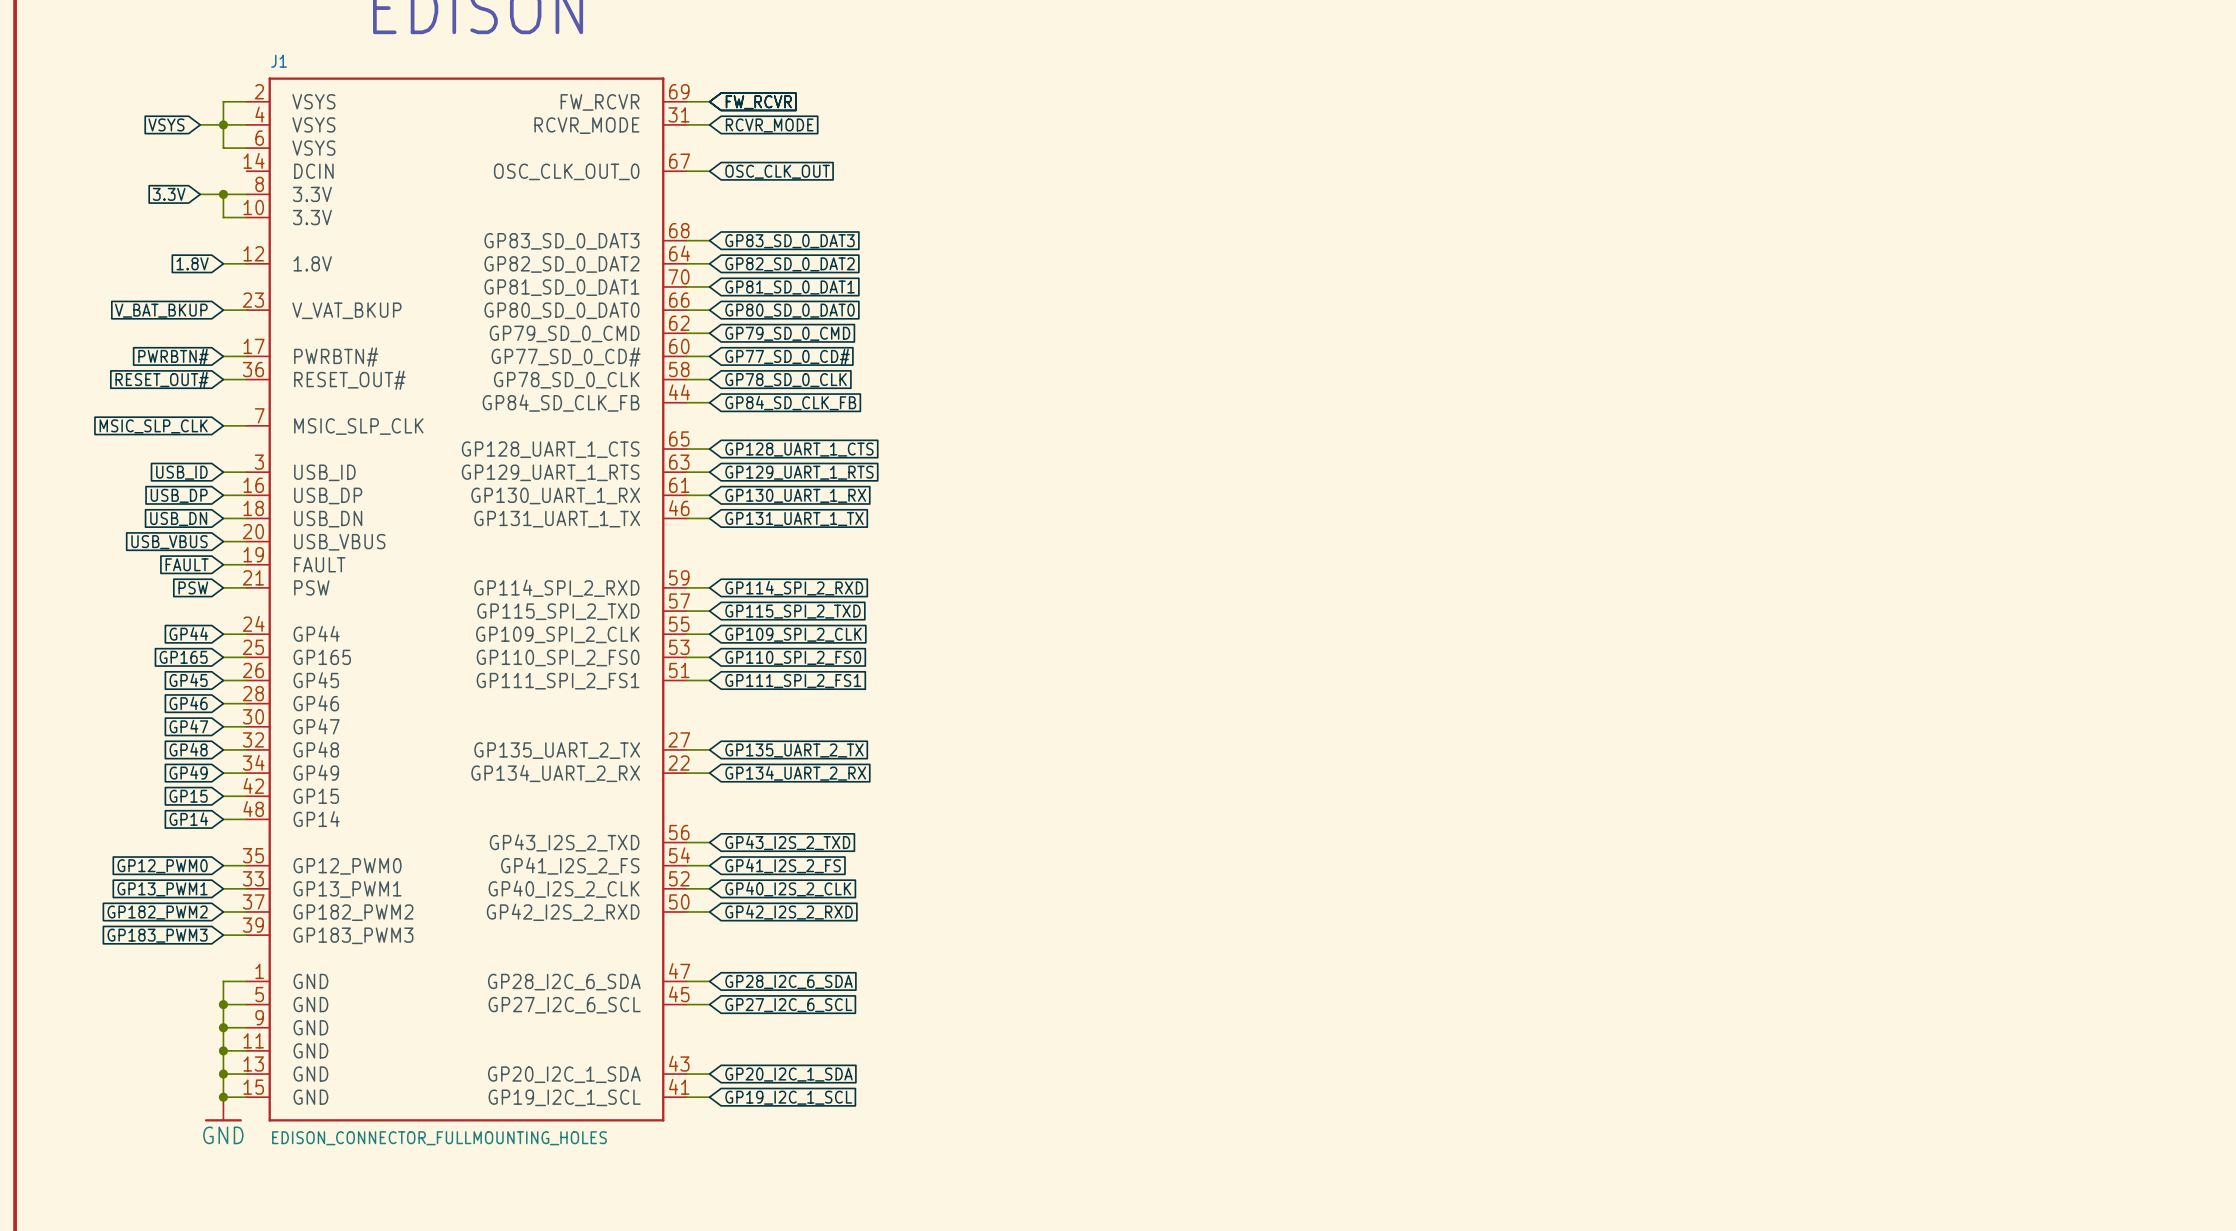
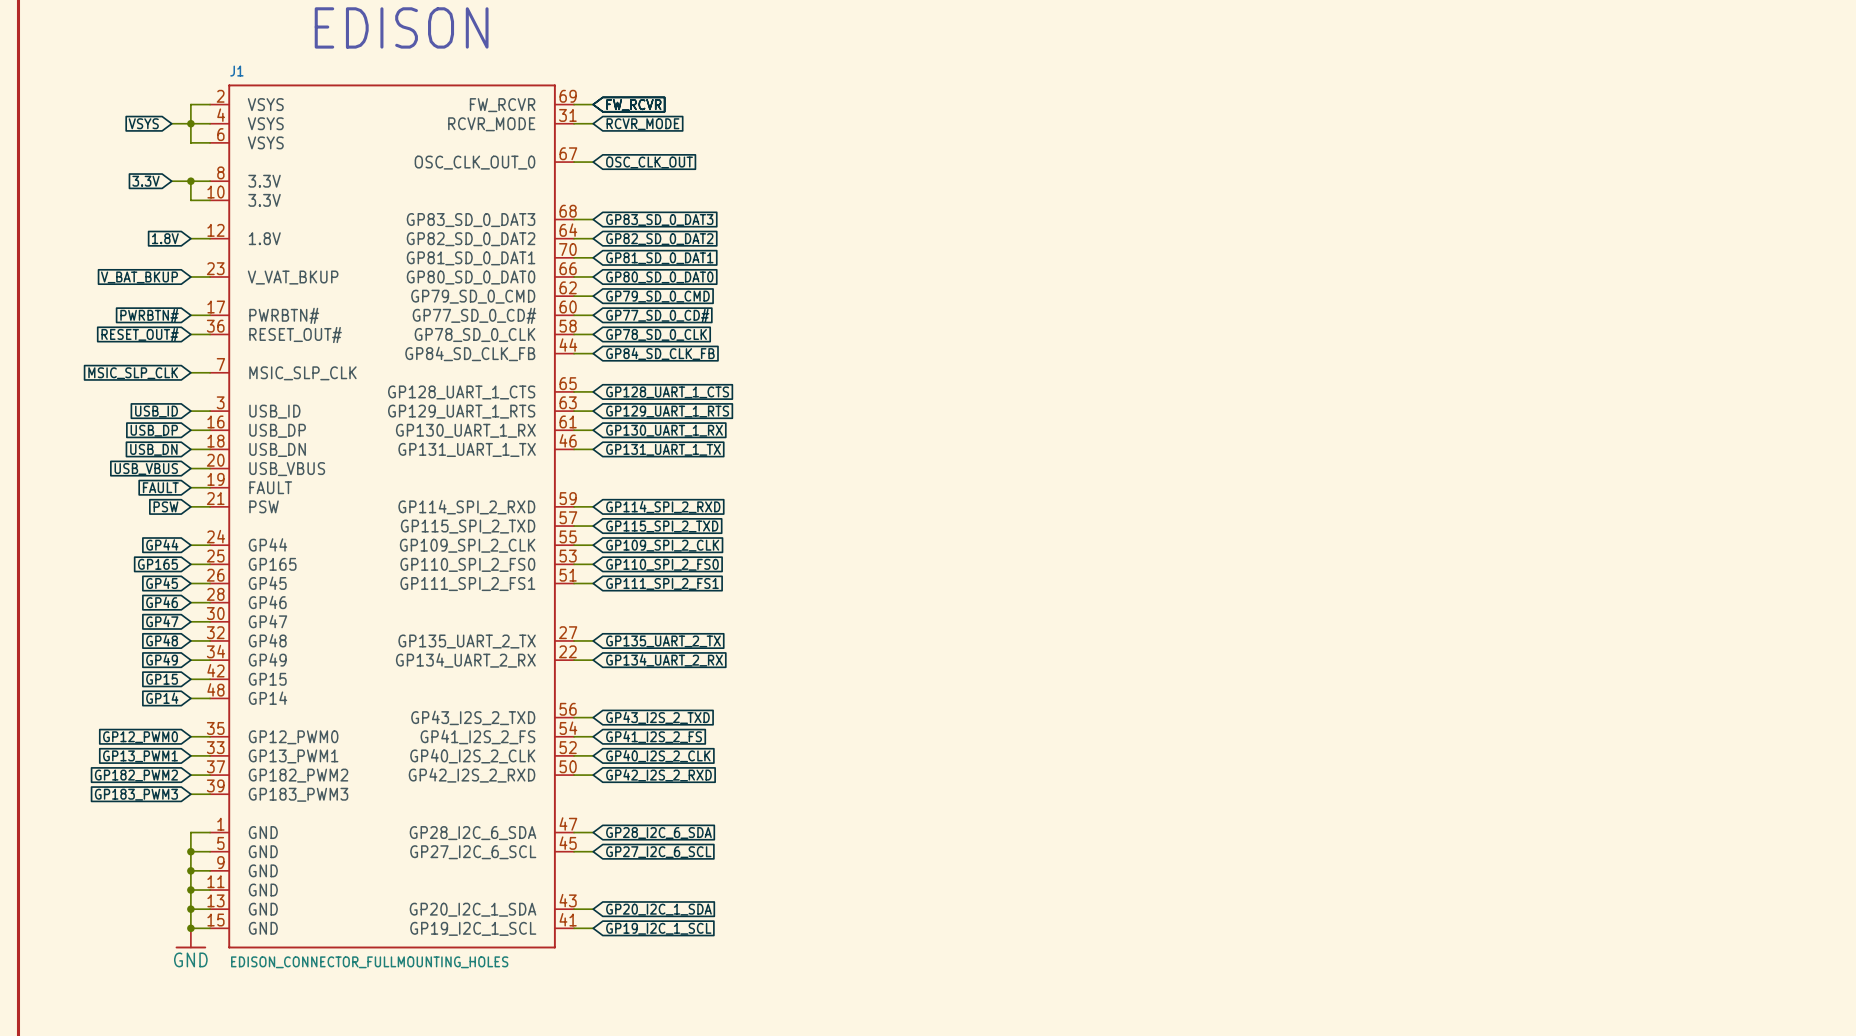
J1 symbol: [246, 77, 687, 1122] -> [210, 84, 575, 949]

